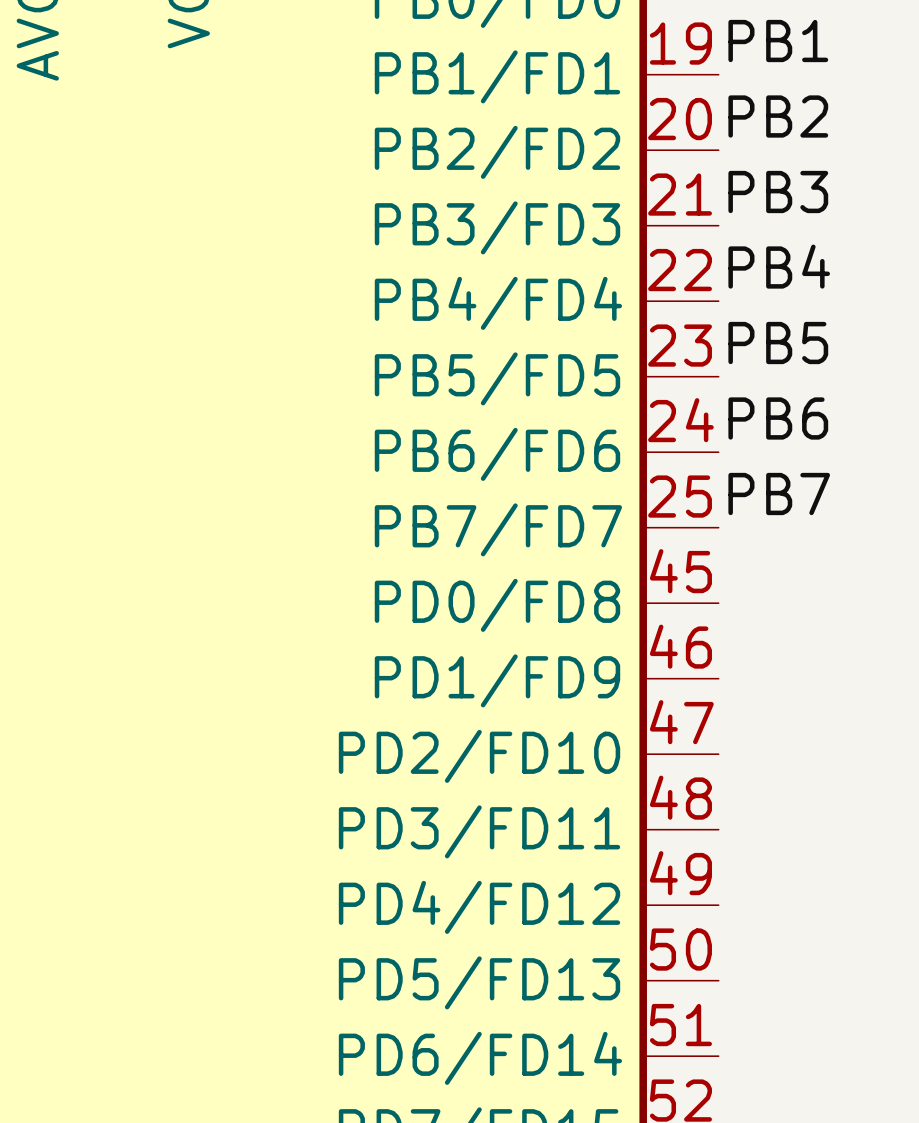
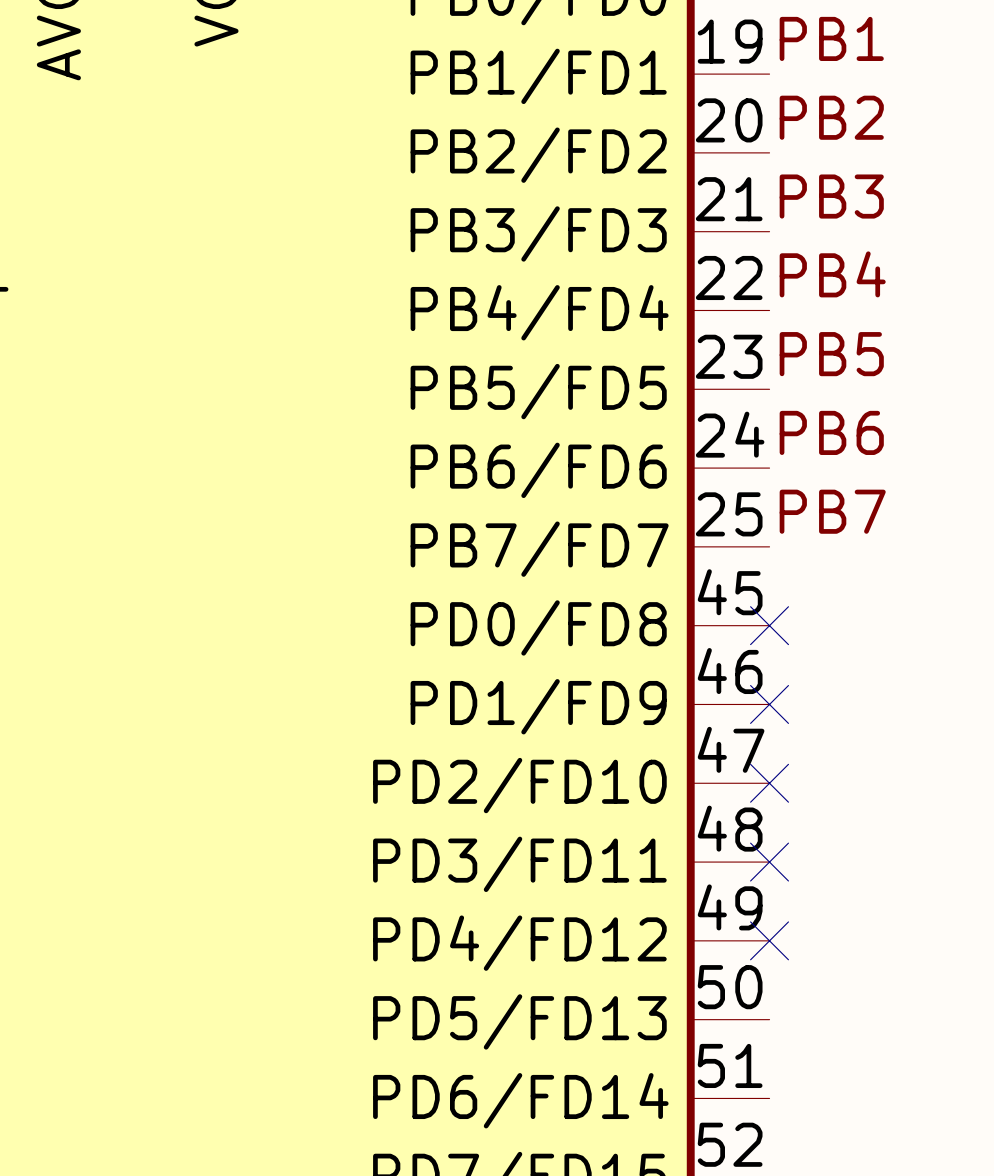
no-connect mark: none -> (769, 625)
no-connect mark: none -> (769, 704)
no-connect mark: none -> (769, 783)
no-connect mark: none -> (769, 862)
no-connect mark: none -> (769, 940)

